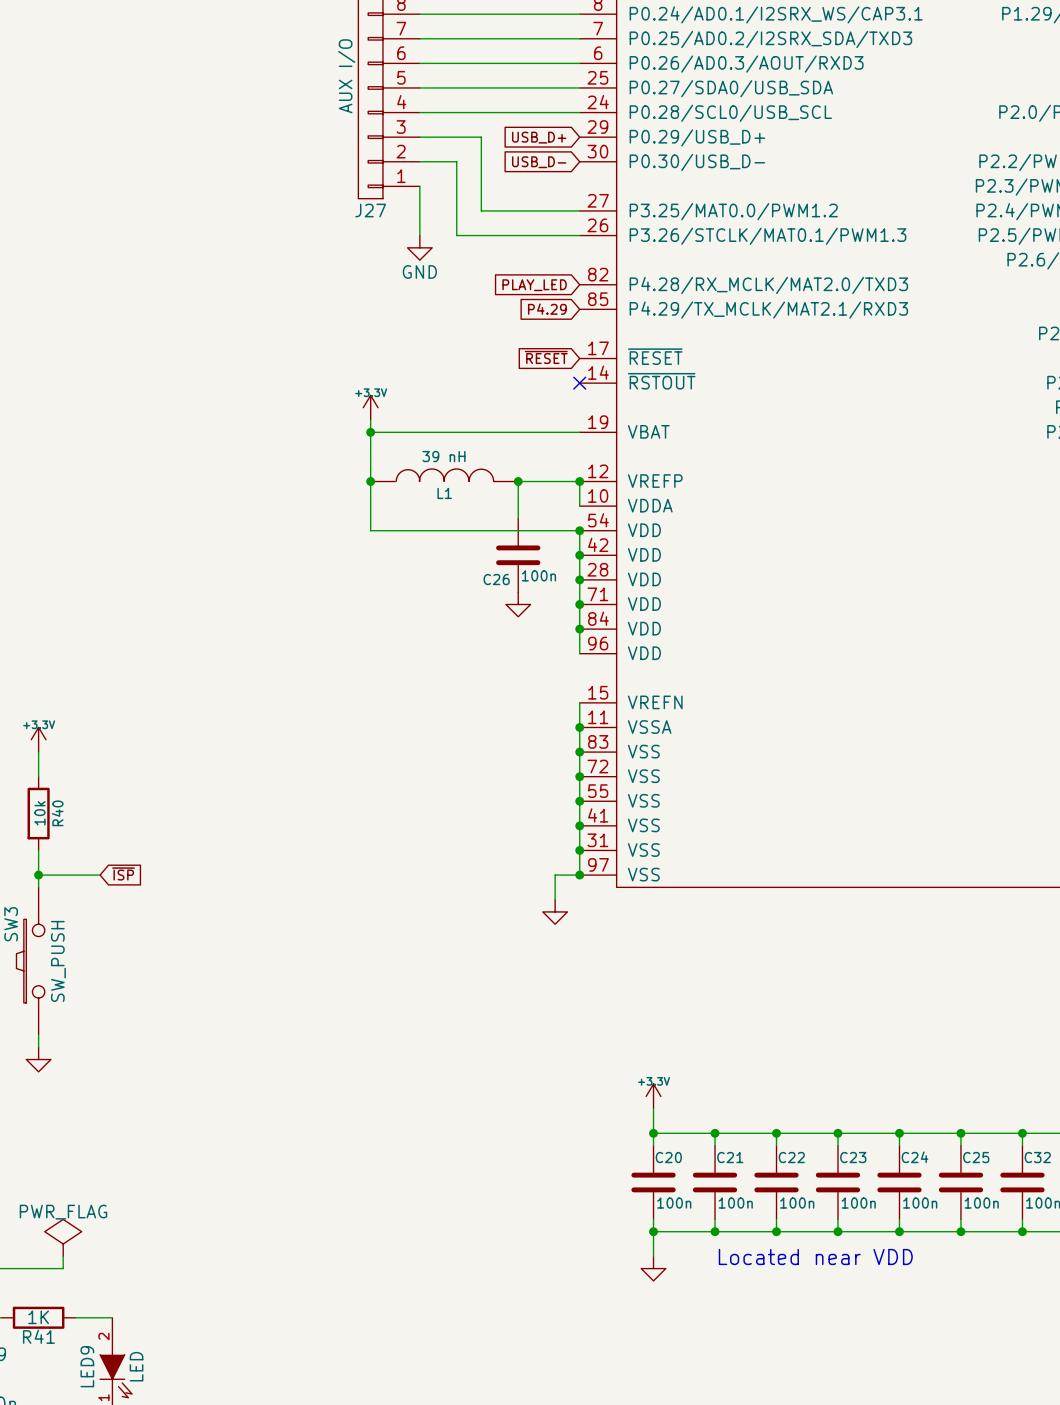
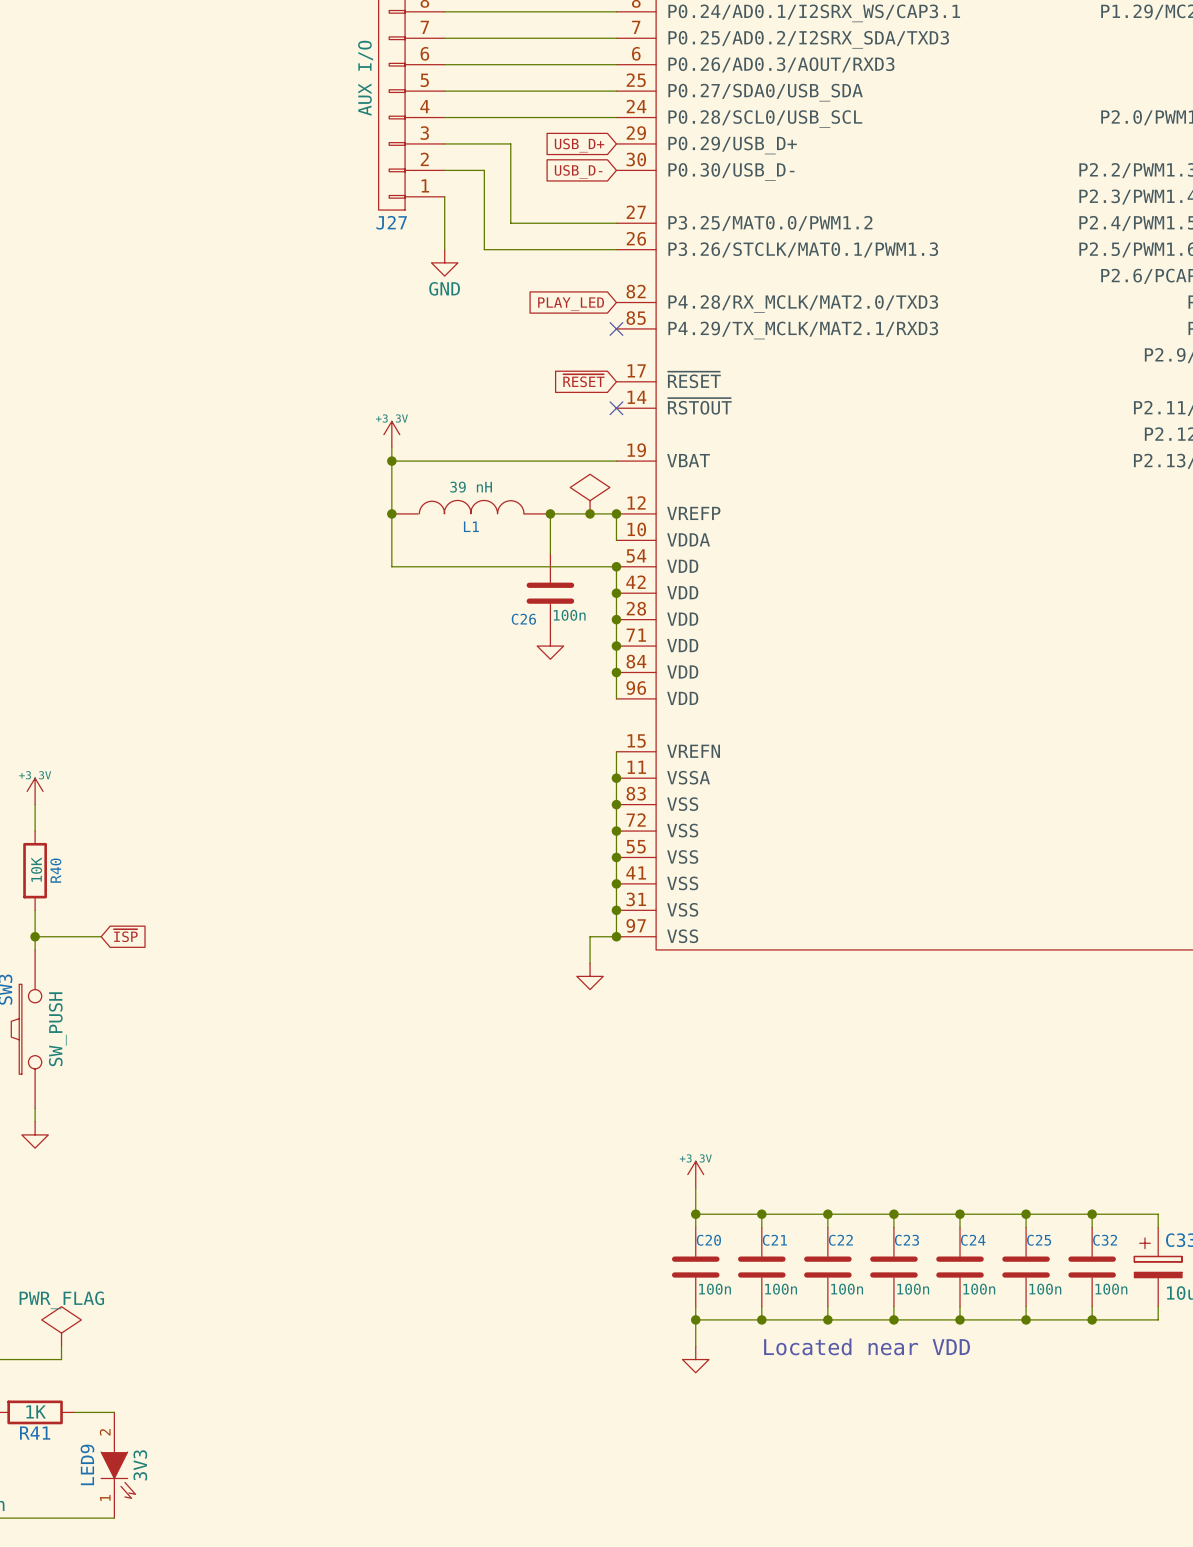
global label: P4.29 (547, 309) -> none
no-connect mark: none -> (616, 328)
power symbol: none -> (590, 494)
junction: none -> (590, 513)
R40 value: 10k (39, 813) -> 10K (36, 869)
LED9 value: LED (136, 1366) -> 3V3 (140, 1465)

